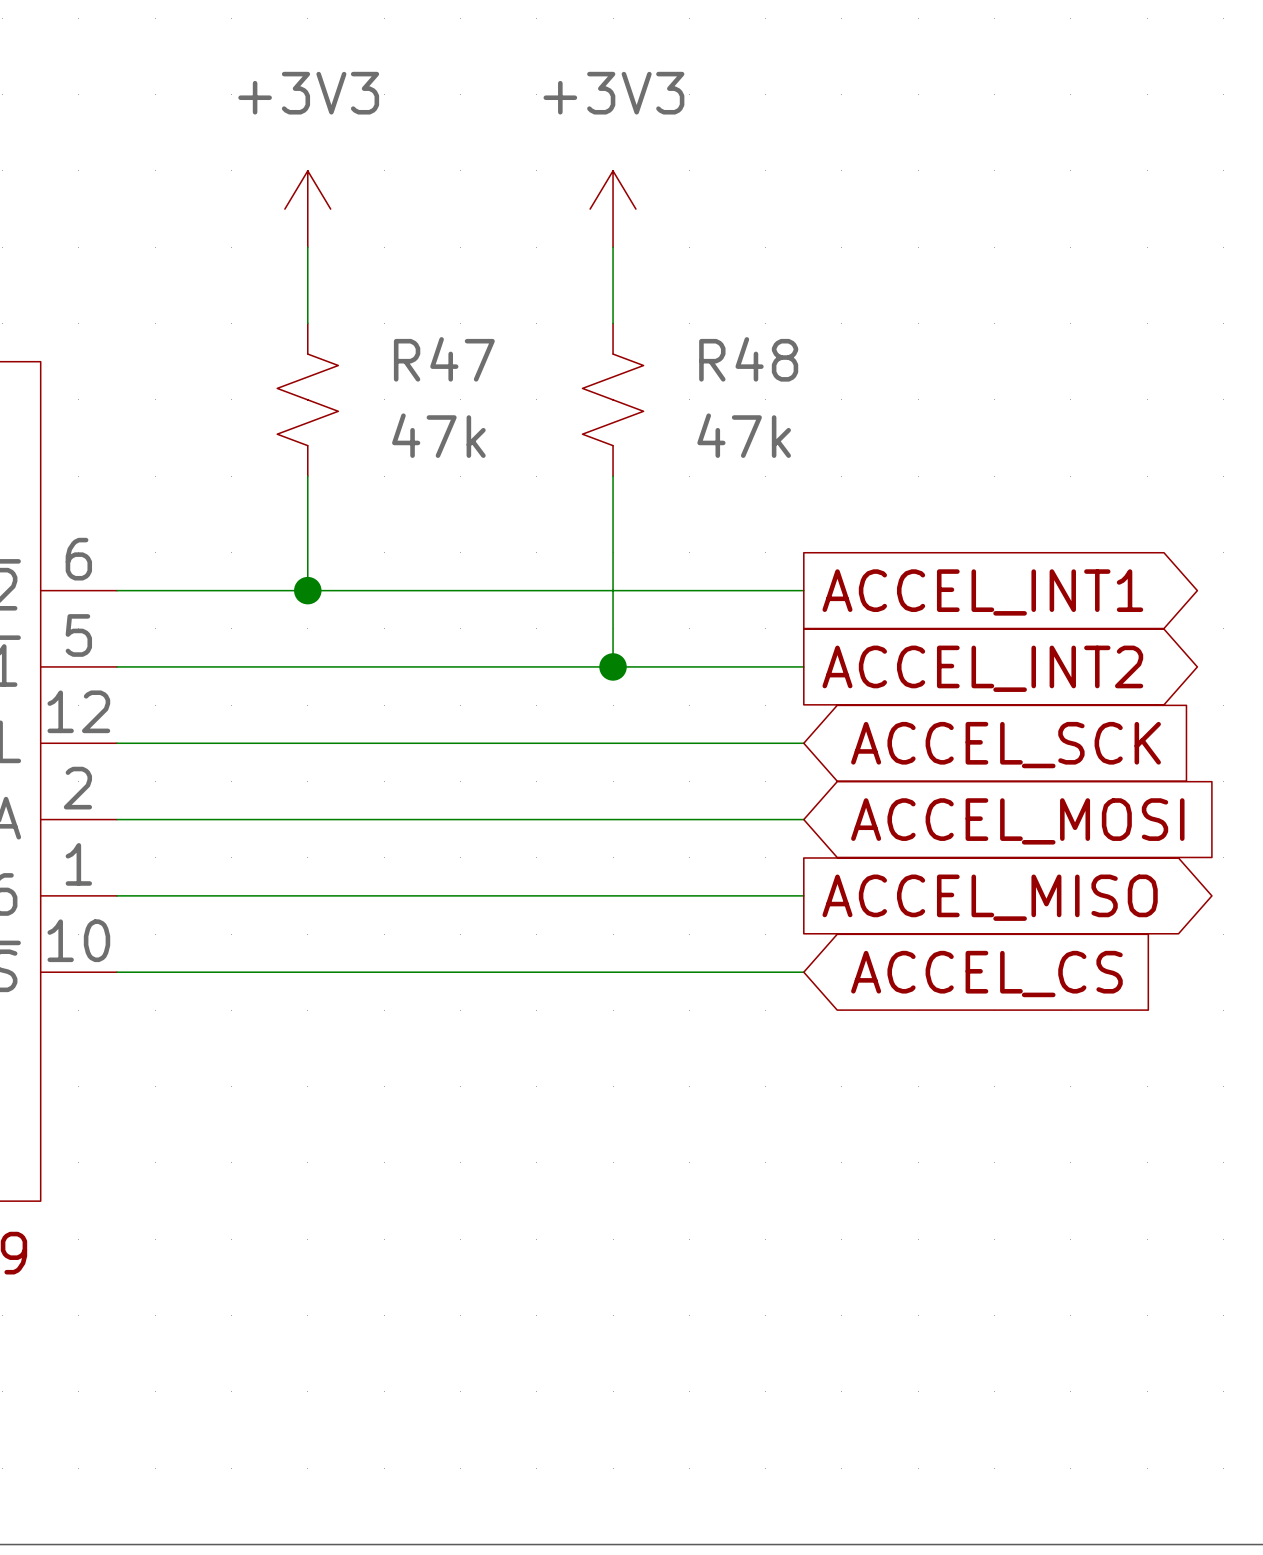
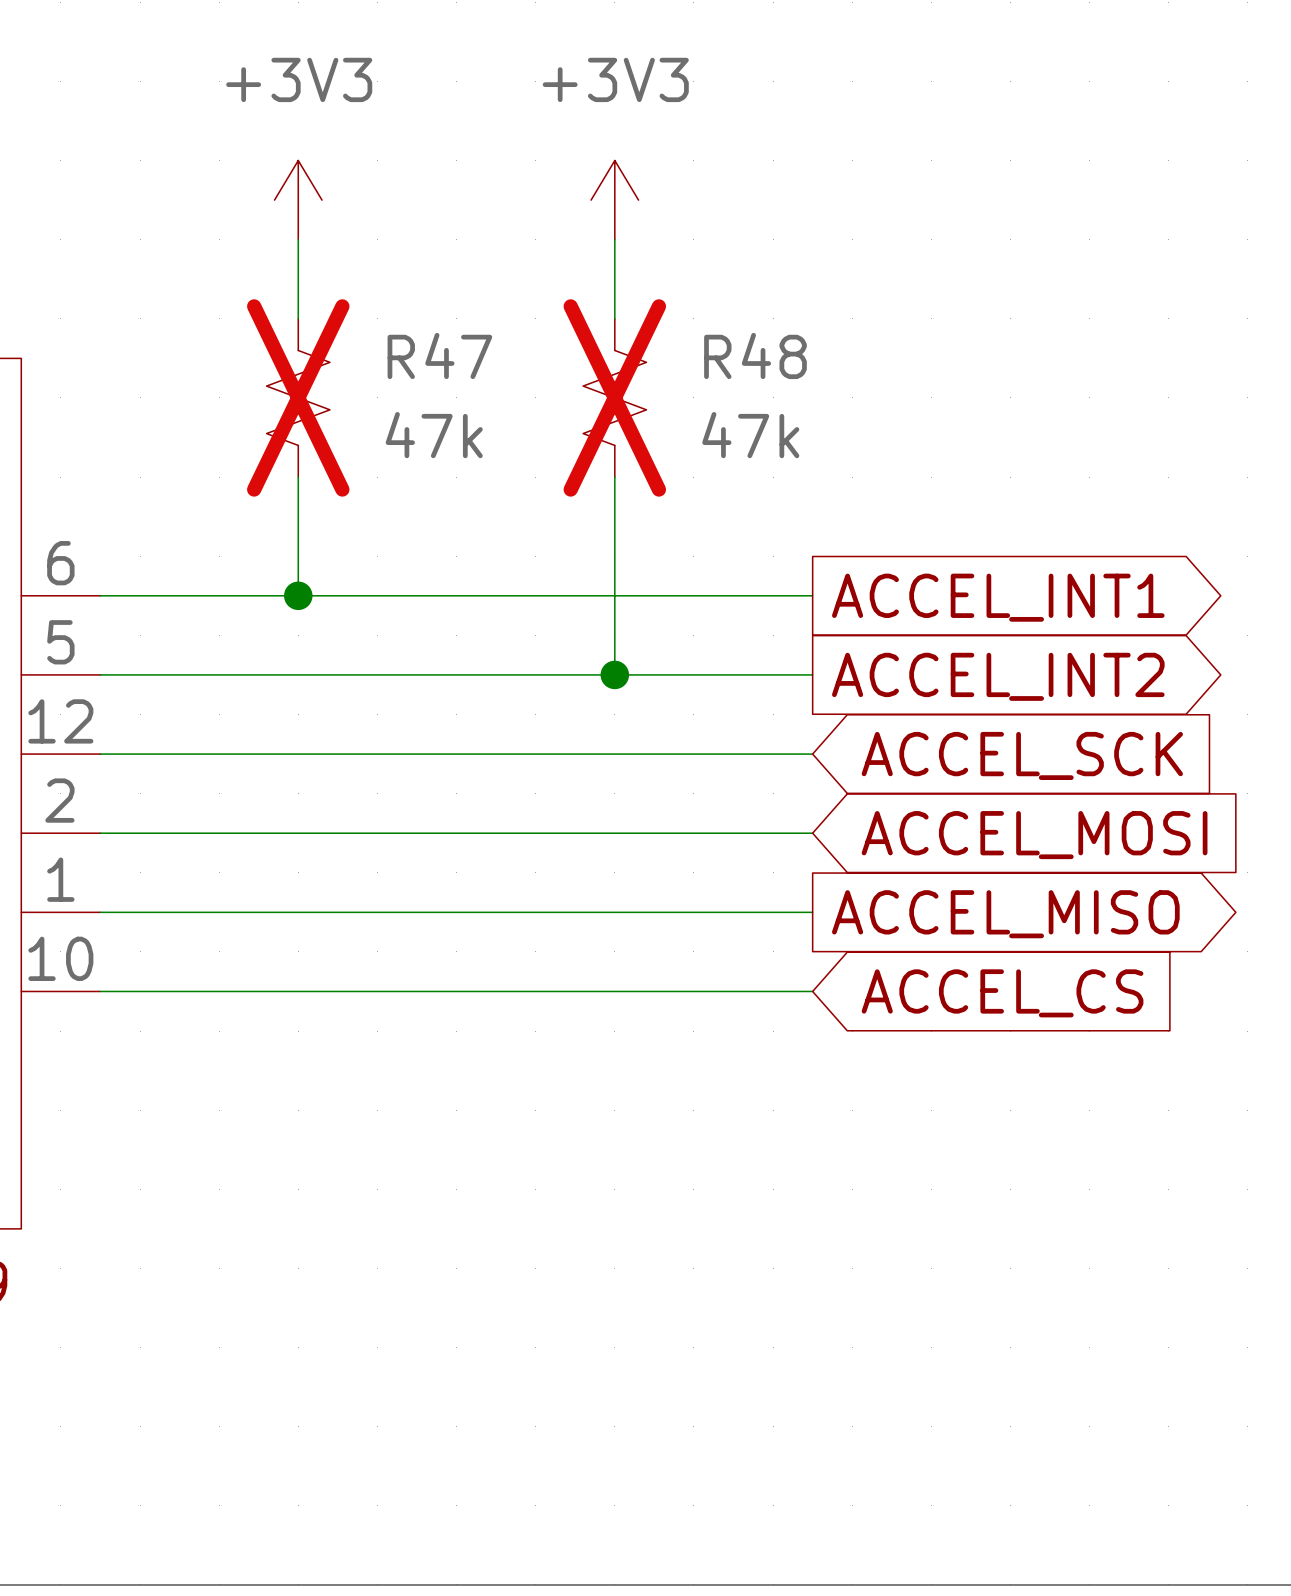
R47 do-not-place cross: none -> (298, 397)
R48 do-not-place cross: none -> (614, 397)

